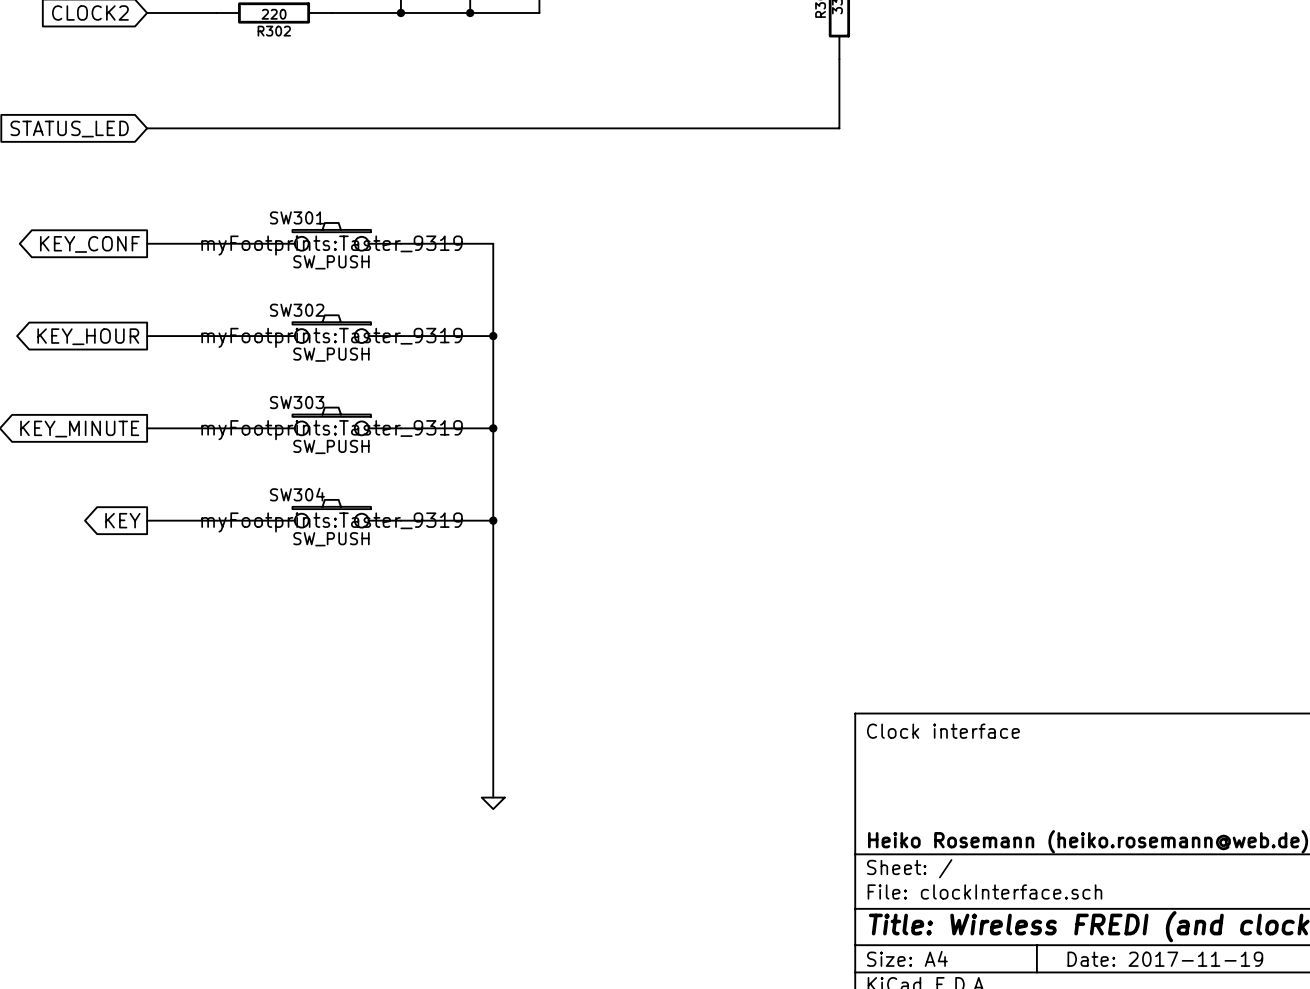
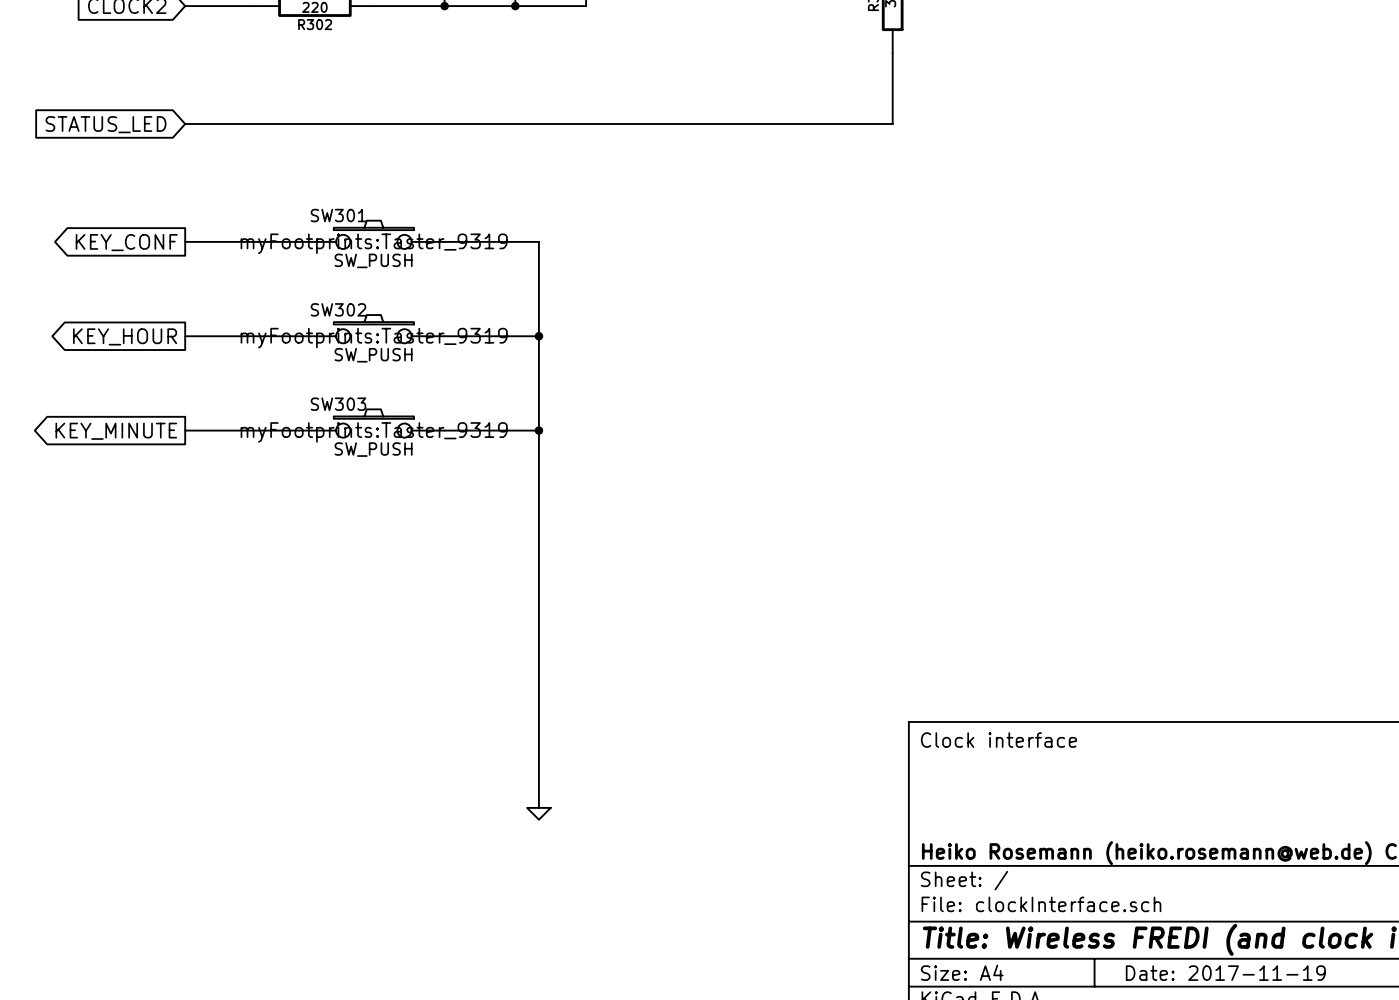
SW304: SW_PUSH (331, 513) -> none
global label: KEY (122, 520) -> none
wire: (147, 520) (262, 520) -> none
wire: (400, 520) (493, 520) -> none
junction: (493, 520) -> none

